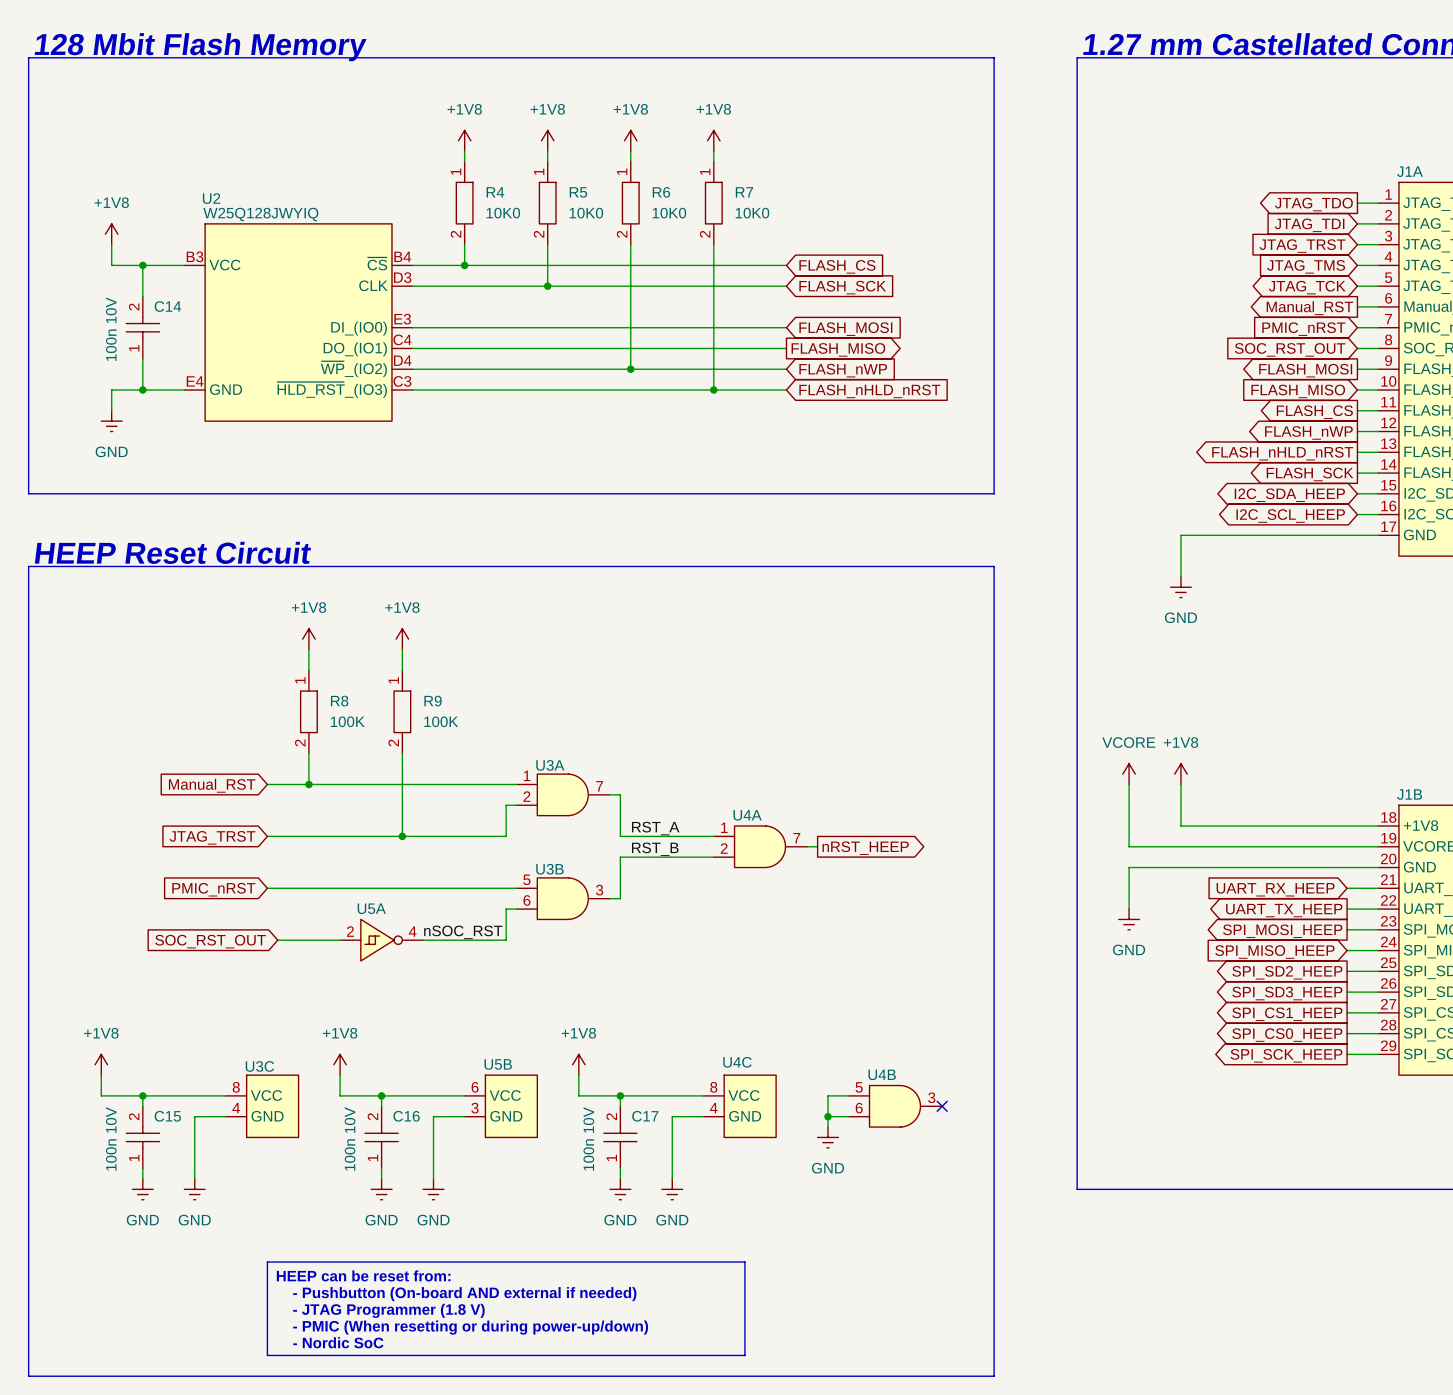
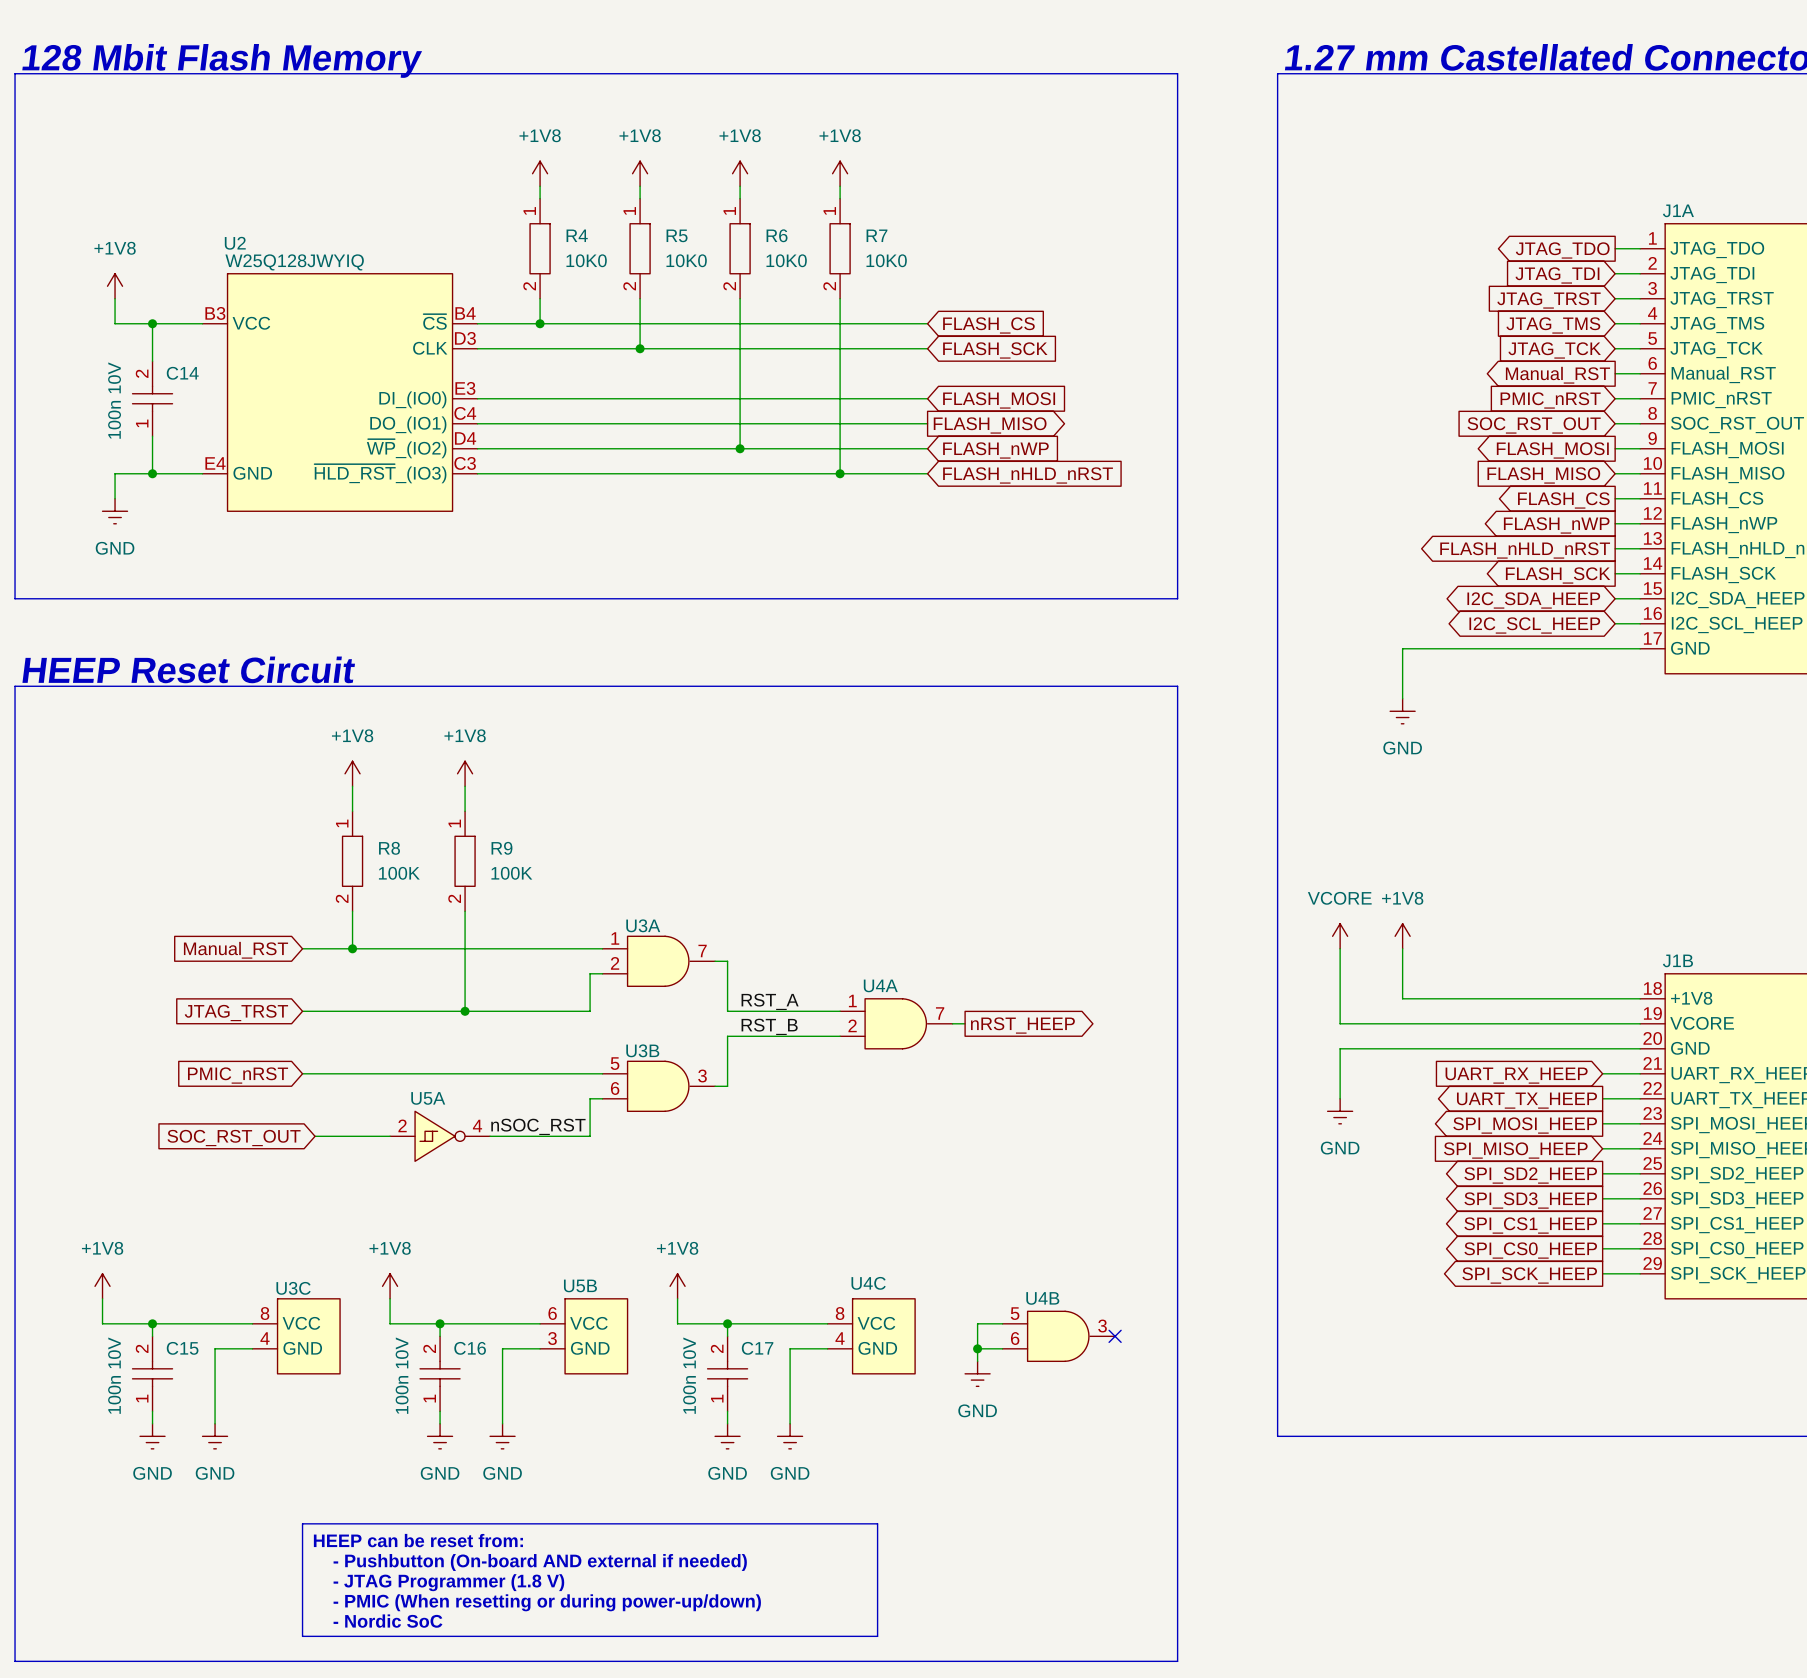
global label shape: bidirectional (1307, 287) -> input (1554, 350)

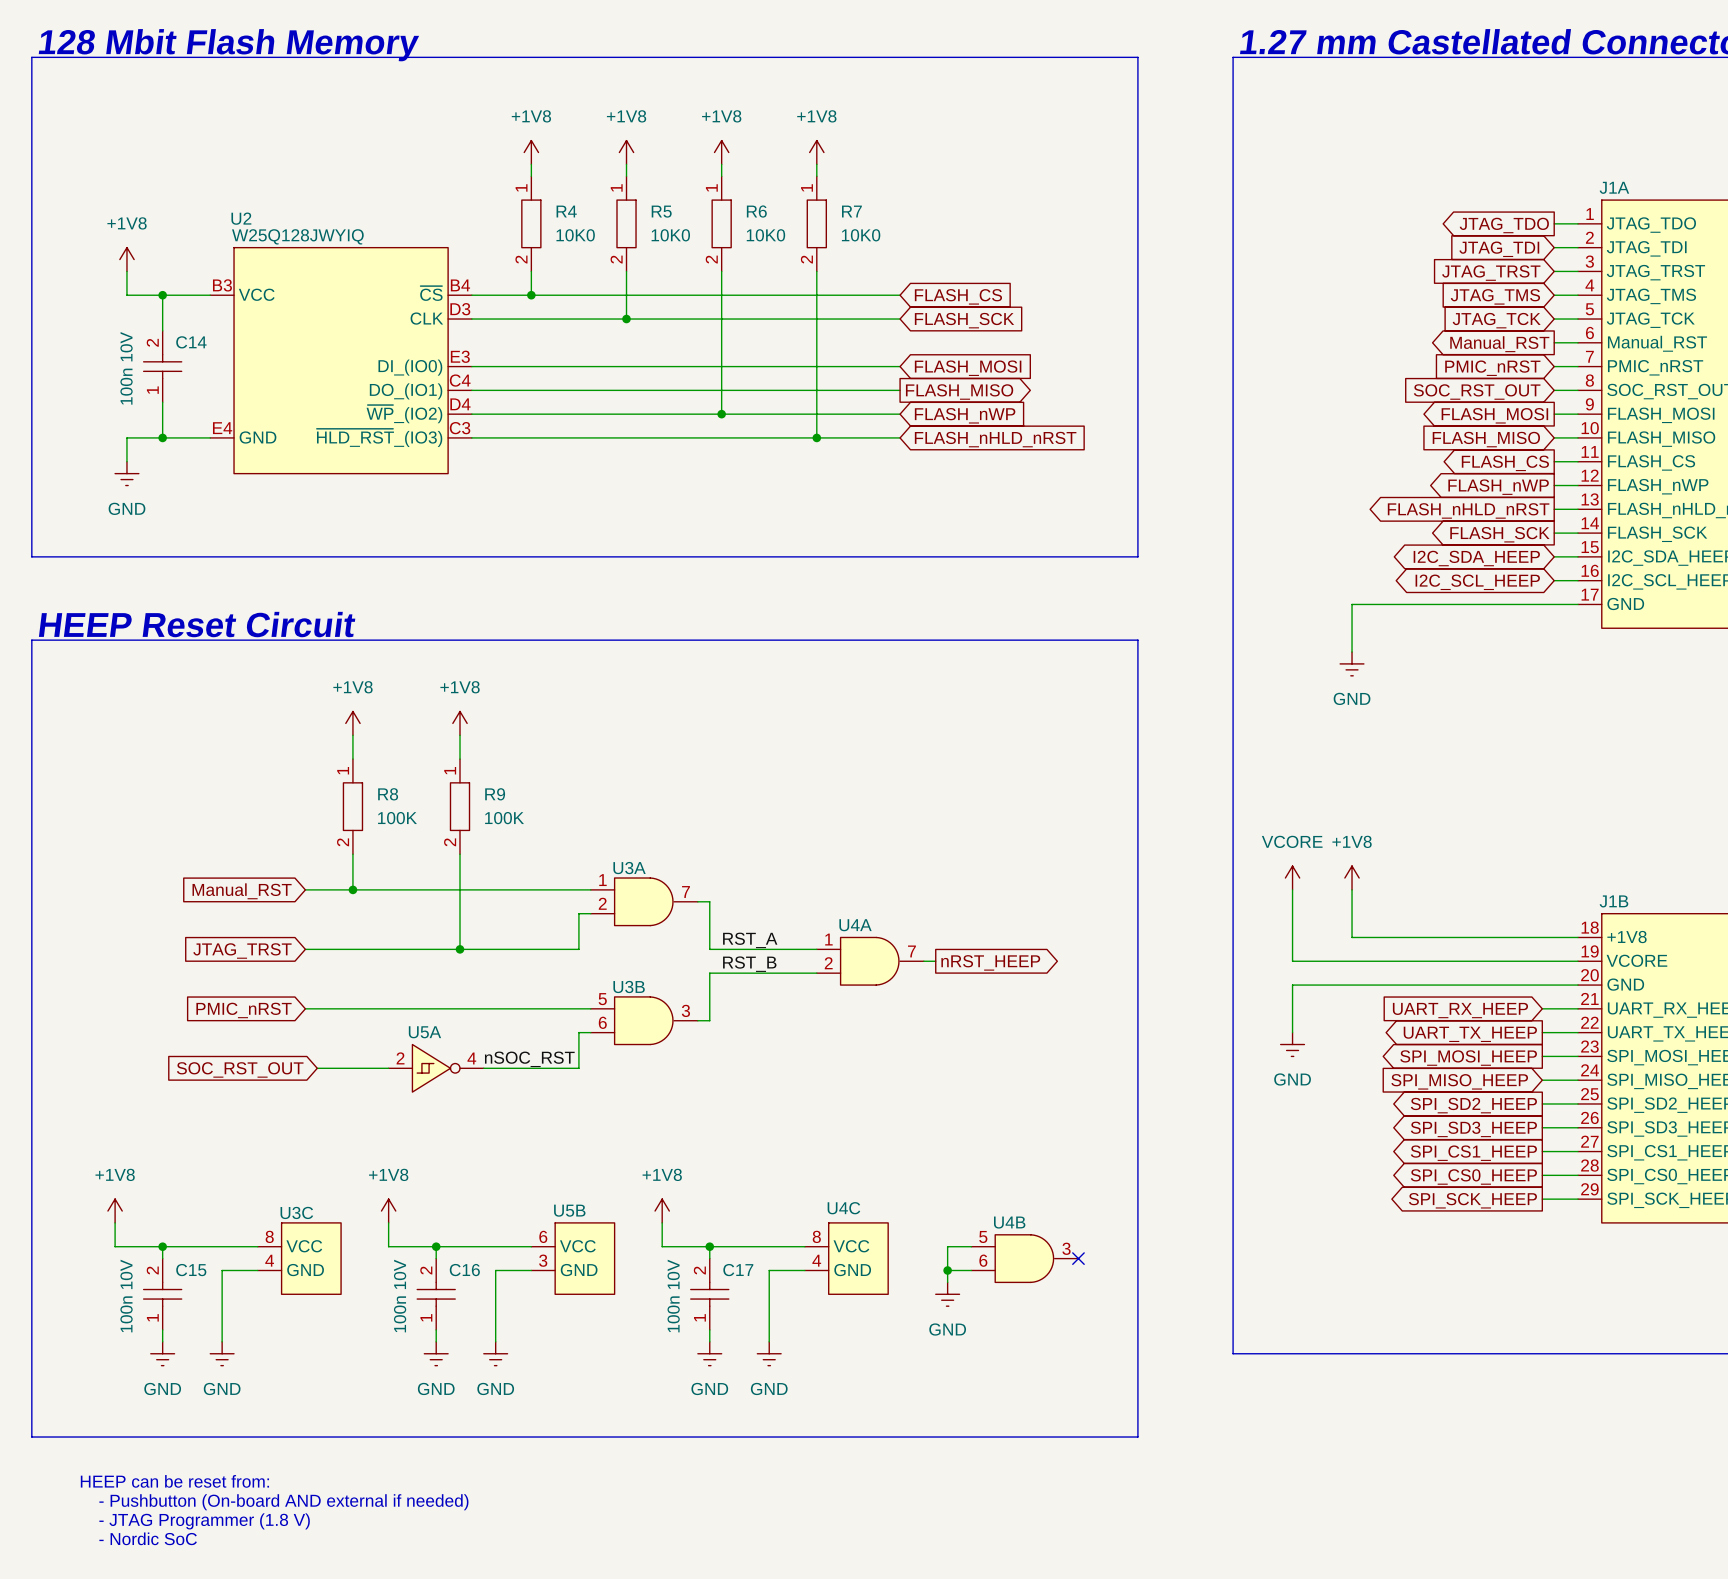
line: (15, 1523) (15, 1661) (1177, 1661) (1177, 1523) -> (852, 1437) (1137, 1437)
line: (302, 1523) (302, 1636) (877, 1636) (877, 1523) -> (305, 1437) (31, 1437)
text: HEEP can be reset from: (418, 1540) -> none
text: - Pushbutton (On-board AND external if needed) (540, 1562) -> none
text: none -> HEEP can be reset from: (174, 1481)
text: - JTAG Programmer (1.8 V) (448, 1582) -> none
text: none -> - Pushbutton (On-board AND external if needed) (283, 1502)
text: - PMIC (When resetting or during power-up/down) (547, 1602) -> none
text: none -> - JTAG Programmer (1.8 V) (204, 1521)
text: - Nordic SoC (387, 1621) -> none
text: none -> - Nordic SoC (148, 1538)

